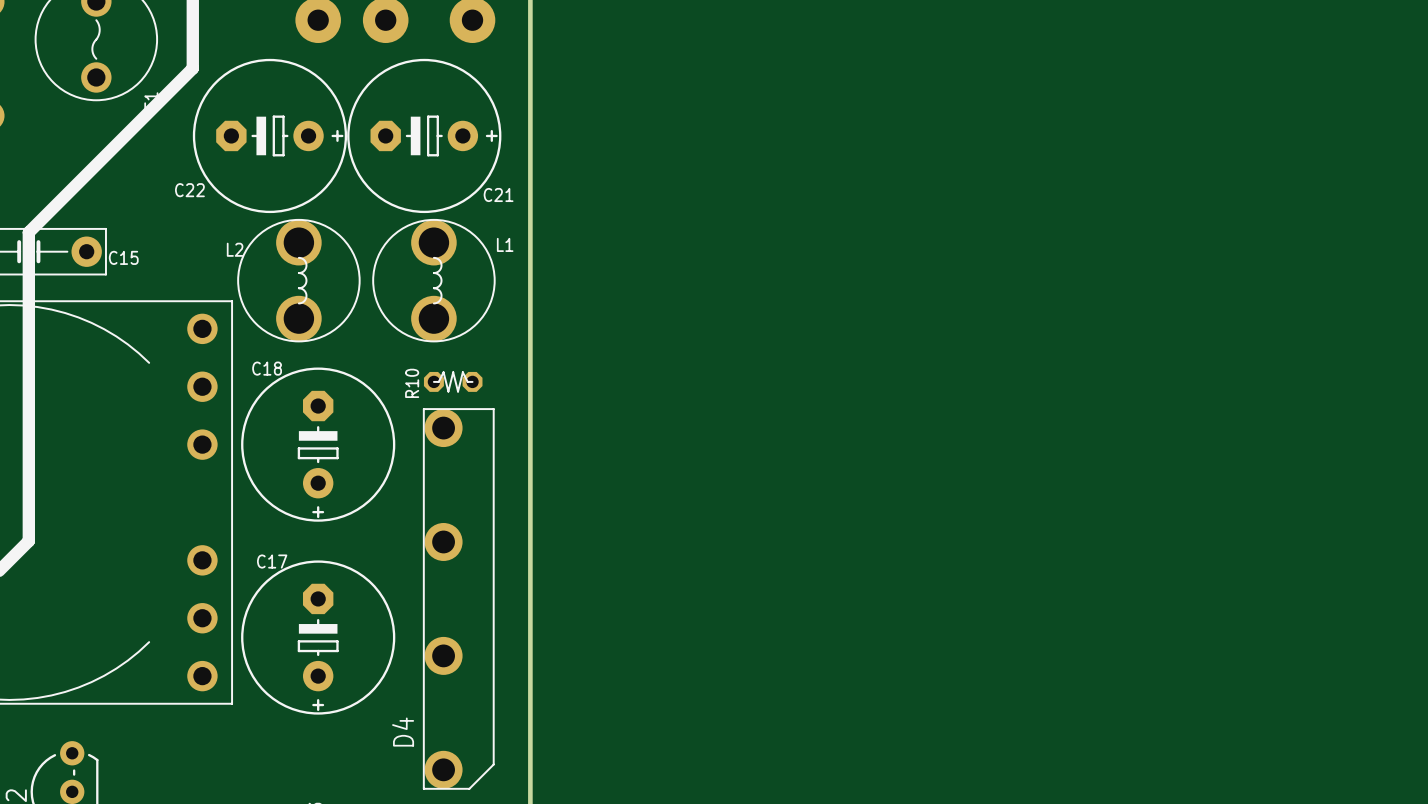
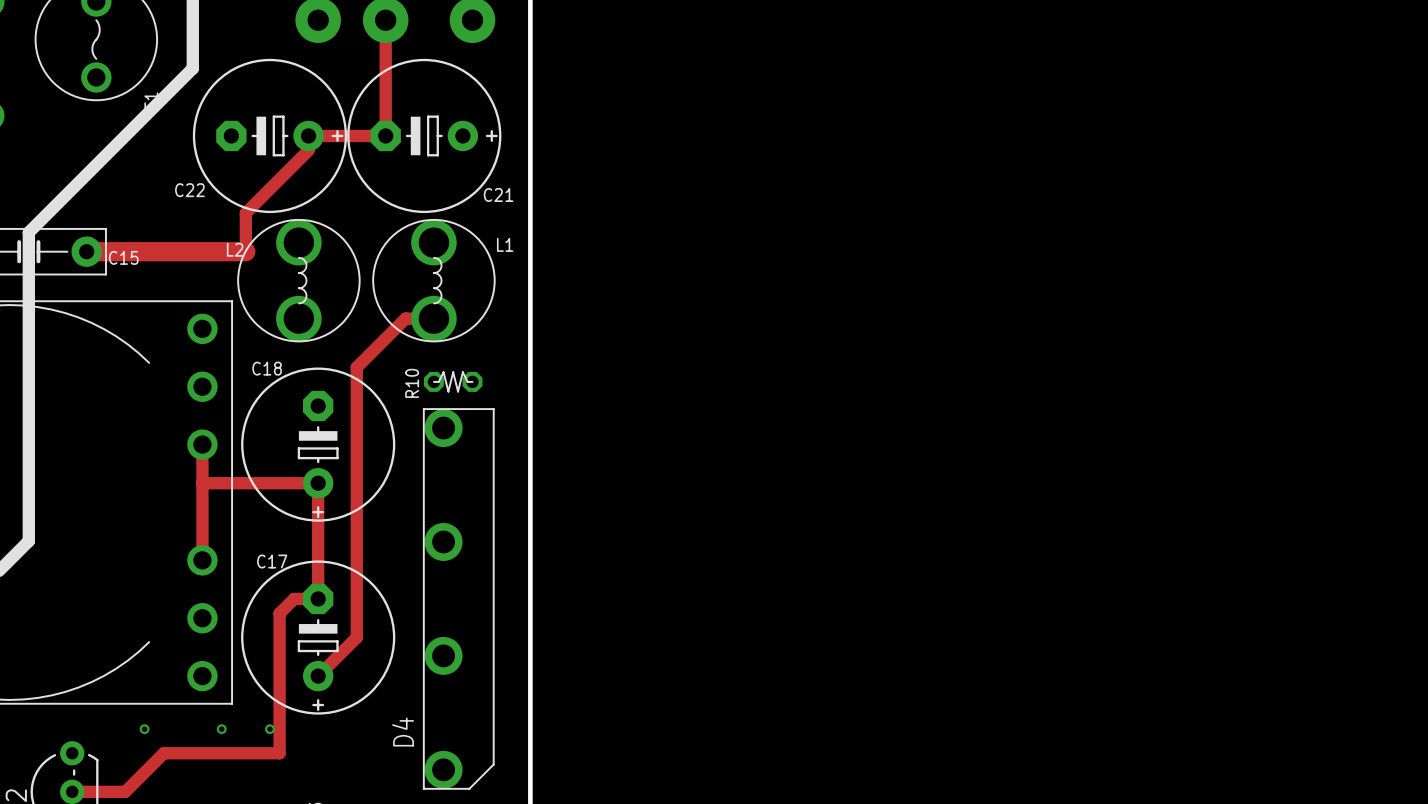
track: none -> (385, 20) (385, 135) (308, 135) (308, 150) (245, 213) (245, 251) (86, 251)
track: none -> (433, 318) (405, 318) (356, 367) (356, 637) (318, 676)
track: none -> (202, 444) (202, 560)
track: none -> (202, 483) (318, 483) (318, 598) (294, 598) (279, 613) (279, 753) (163, 753) (125, 791) (72, 791)
via: none -> (144, 729)
via: none -> (221, 729)
via: none -> (269, 729)

